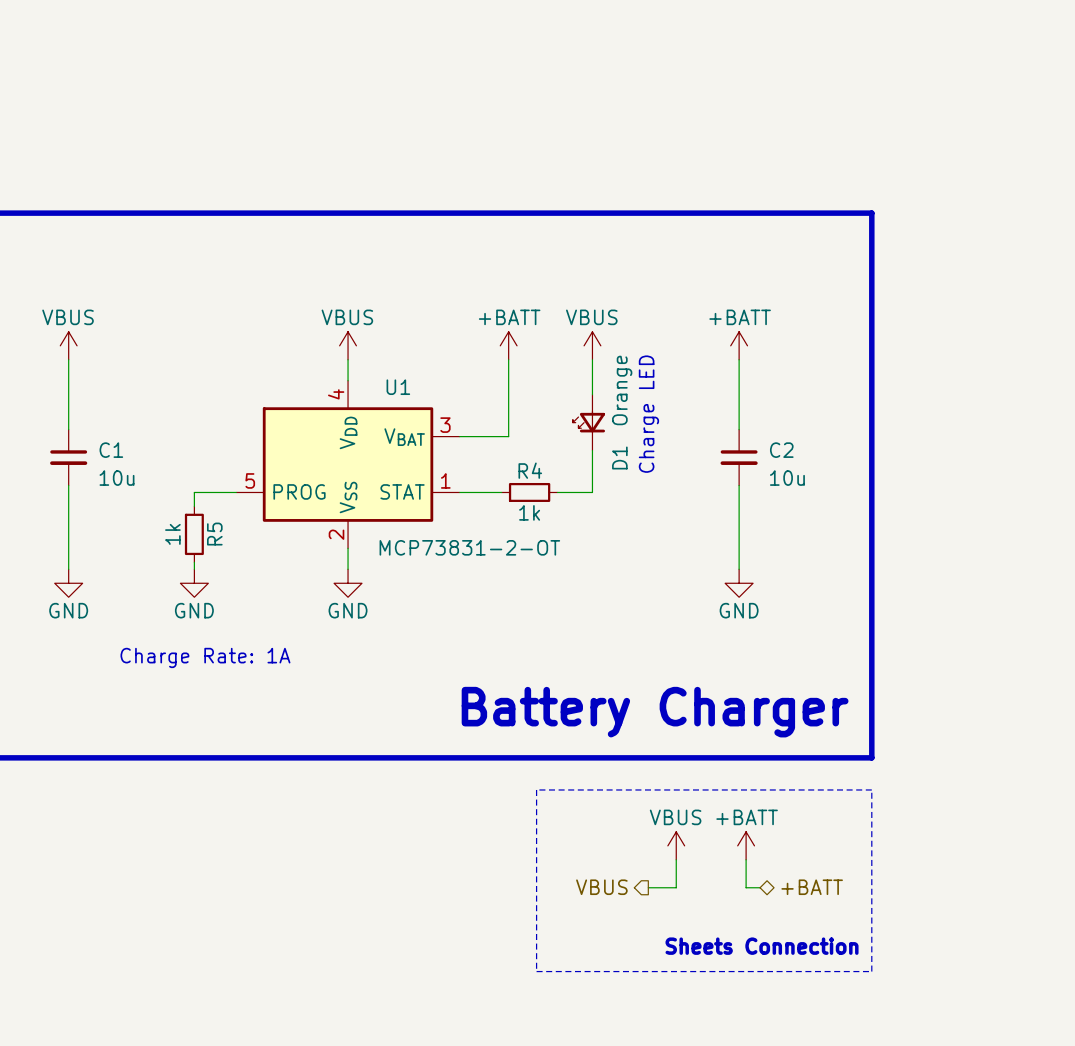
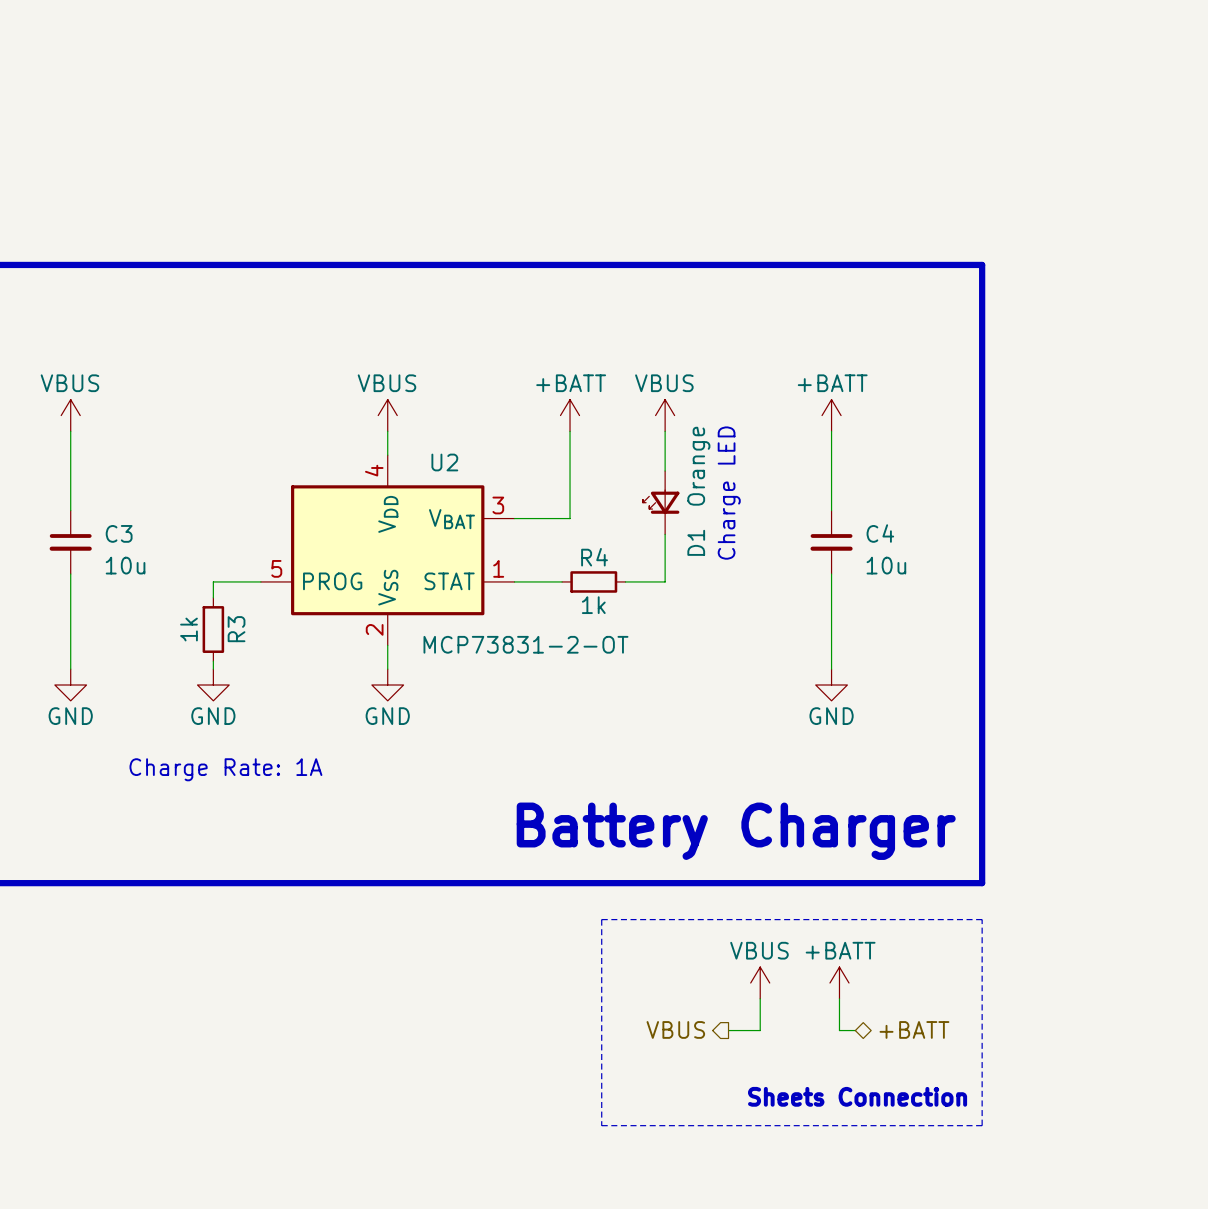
U1 name: U1 (398, 387) -> U2 (444, 462)
C1 name: C1 (111, 450) -> C3 (119, 533)
C2 name: C2 (781, 450) -> C4 (880, 533)
R5 name: R5 (214, 534) -> R3 (236, 629)

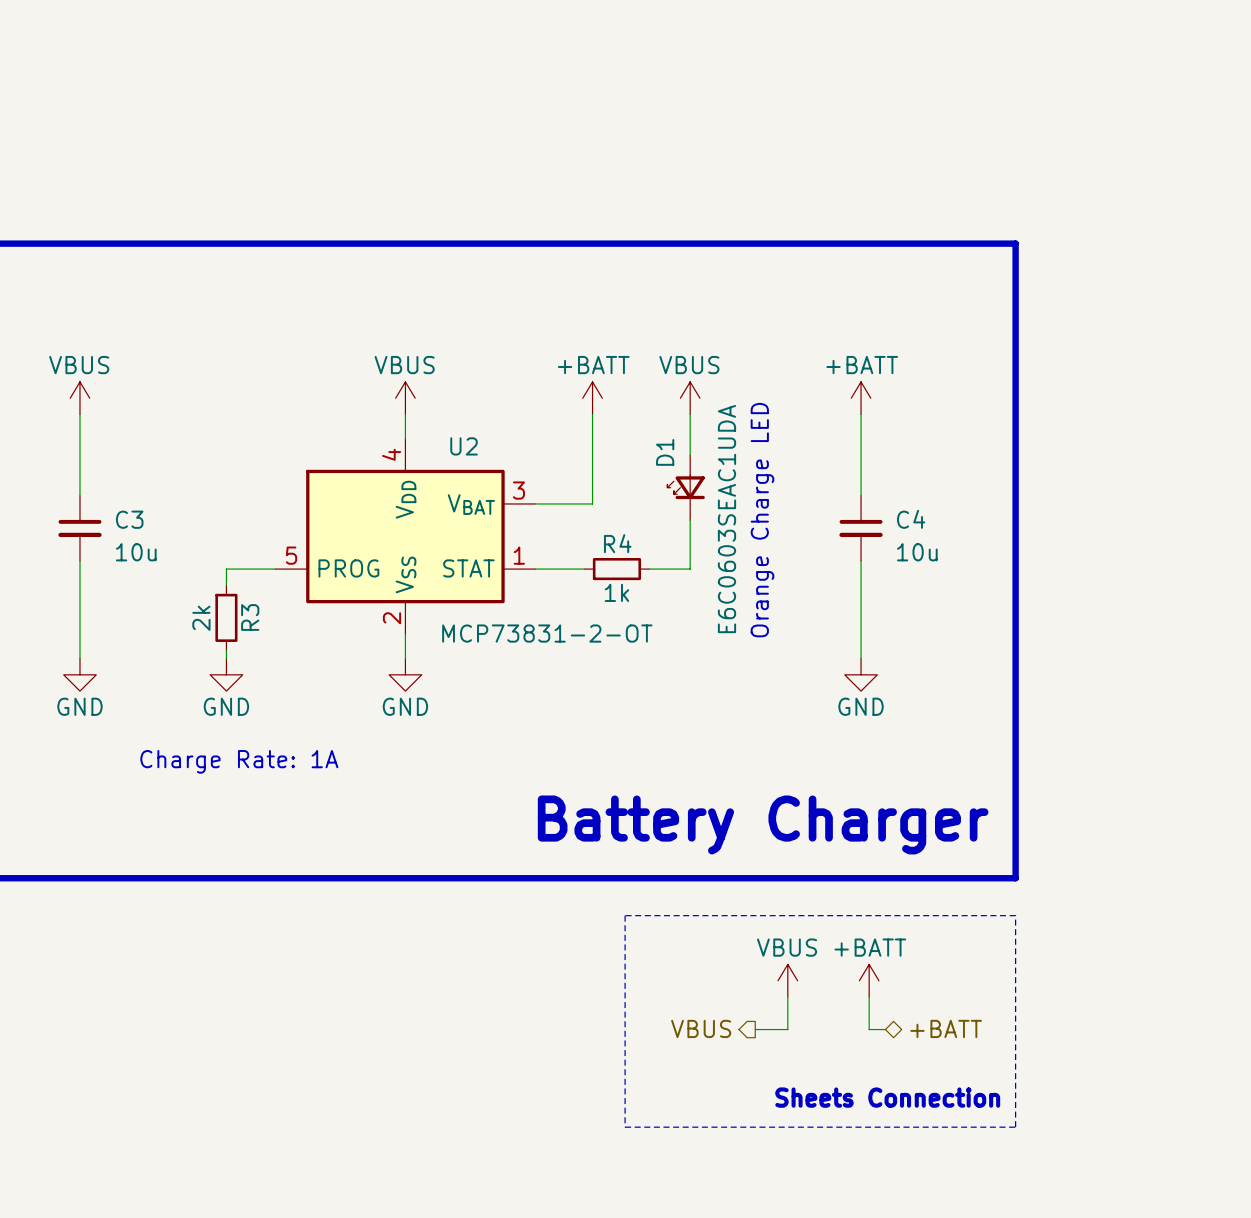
D1 value: Orange (698, 466) -> E6C0603SEAC1UDA (726, 519)
text: Charge LED (729, 493) -> Orange Charge LED (762, 520)
D1 name position: D1 (696, 542) -> D1 (665, 452)
R3 value: 1k (188, 629) -> 2k (201, 618)

